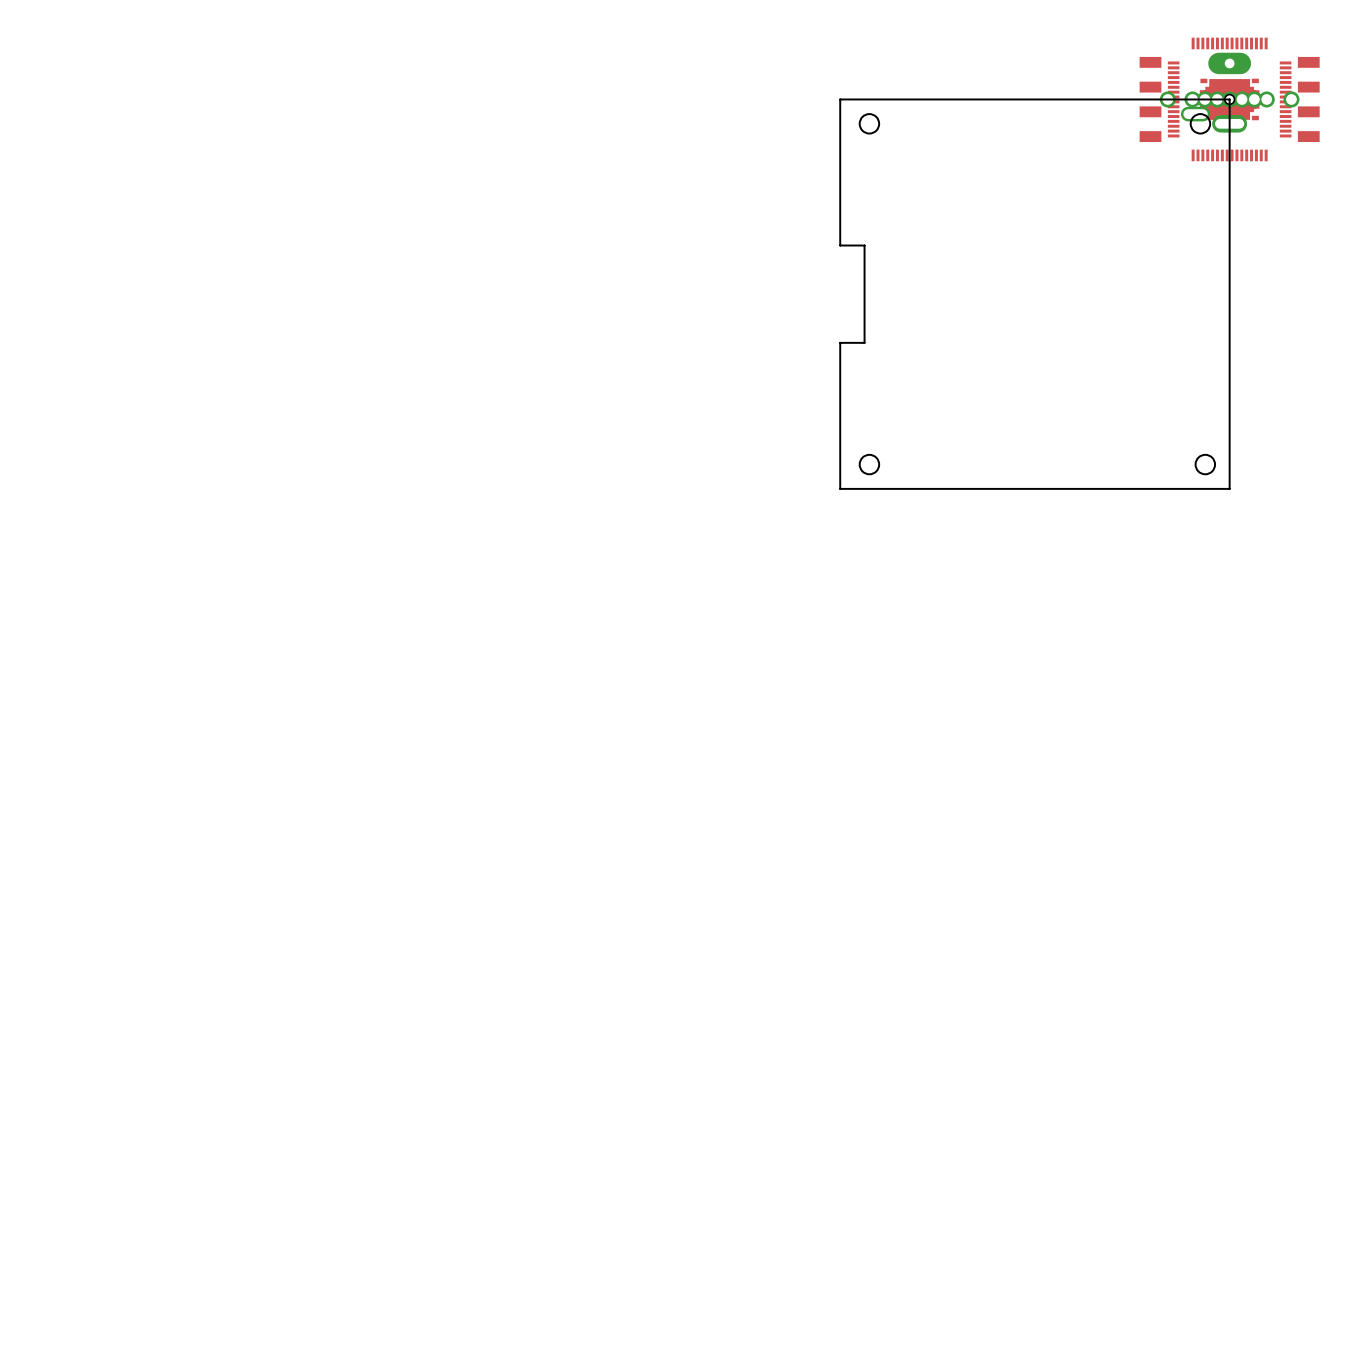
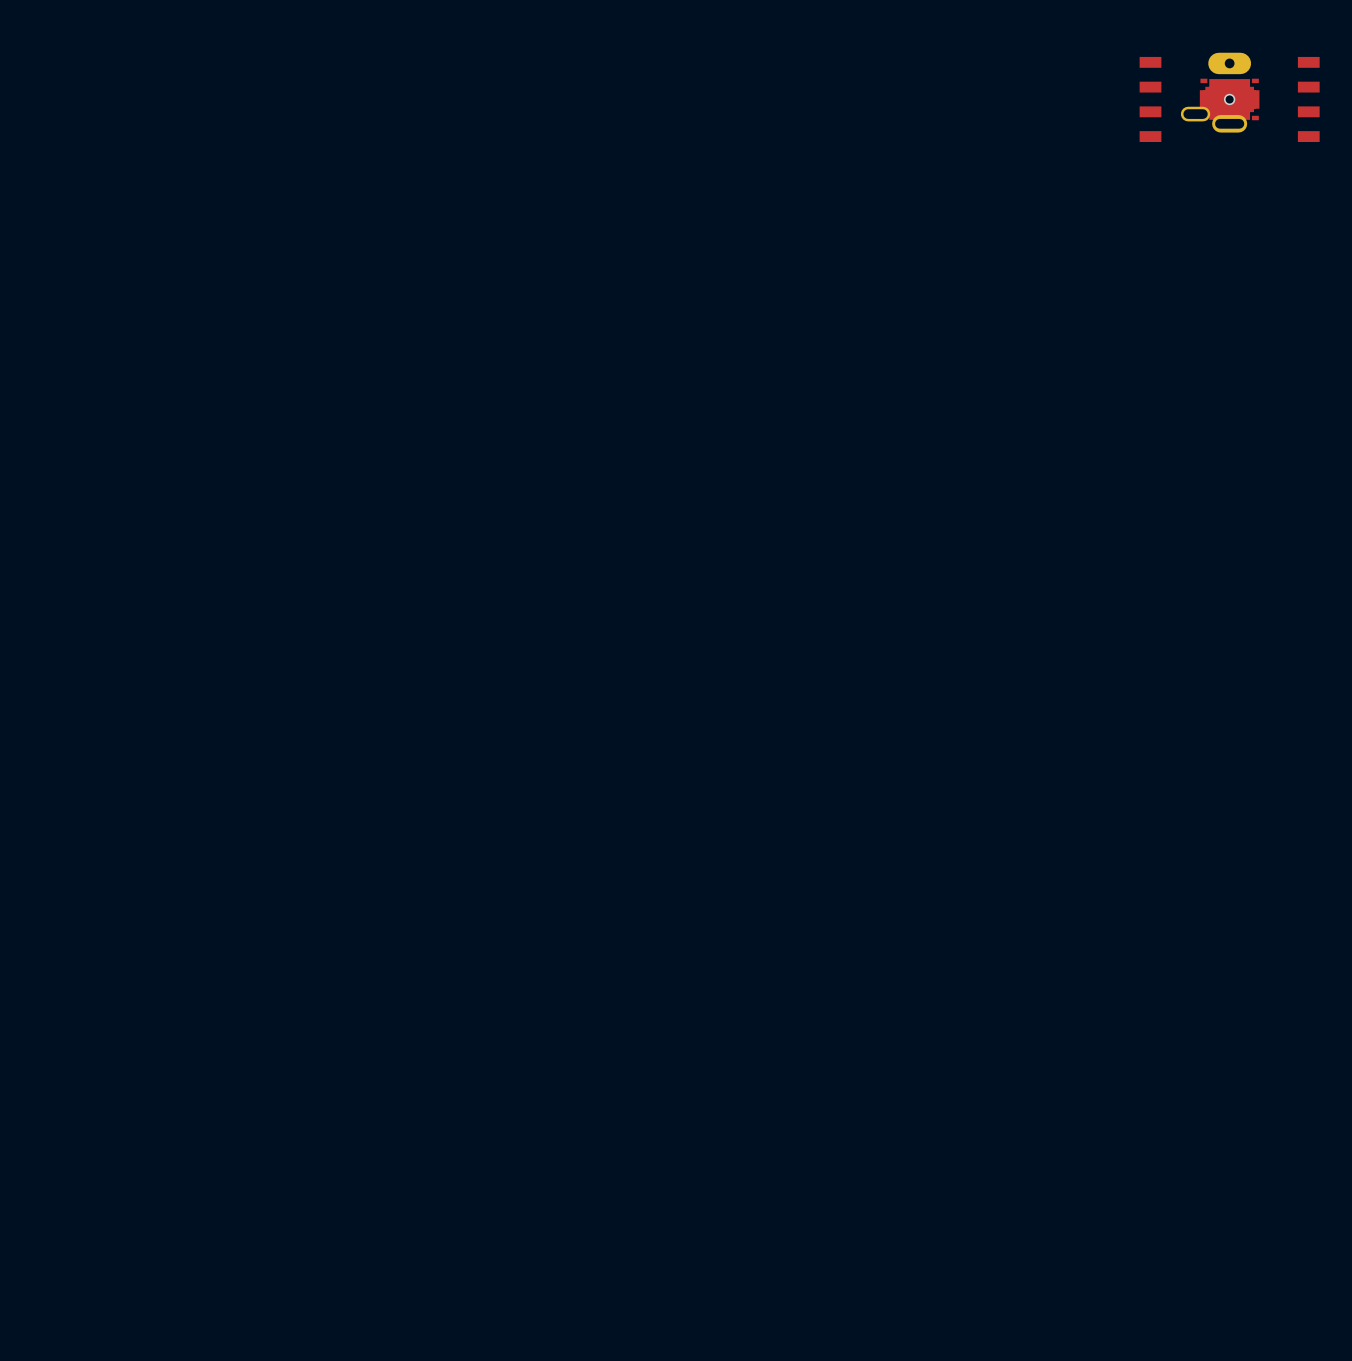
board edge: (1229, 99) (840, 99) (840, 245) (864, 245) (864, 342) (840, 342) (840, 488) (1229, 488) (1229, 99) -> none
part: (1229, 99) -> none
part: (1229, 99) -> none
part: (1229, 99) -> none
round board edge: [858, 113, 881, 135] -> none
round board edge: [1189, 113, 1212, 135] -> none
round board edge: [858, 453, 881, 476] -> none
round board edge: [1194, 453, 1217, 476] -> none

